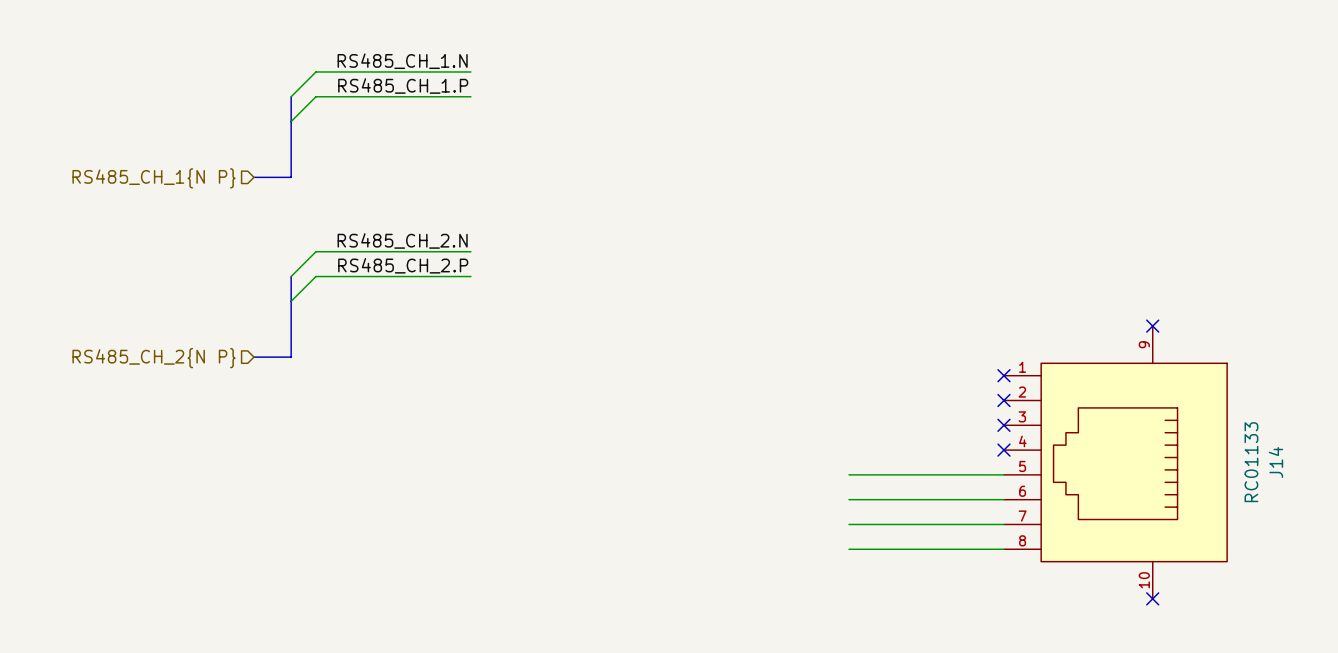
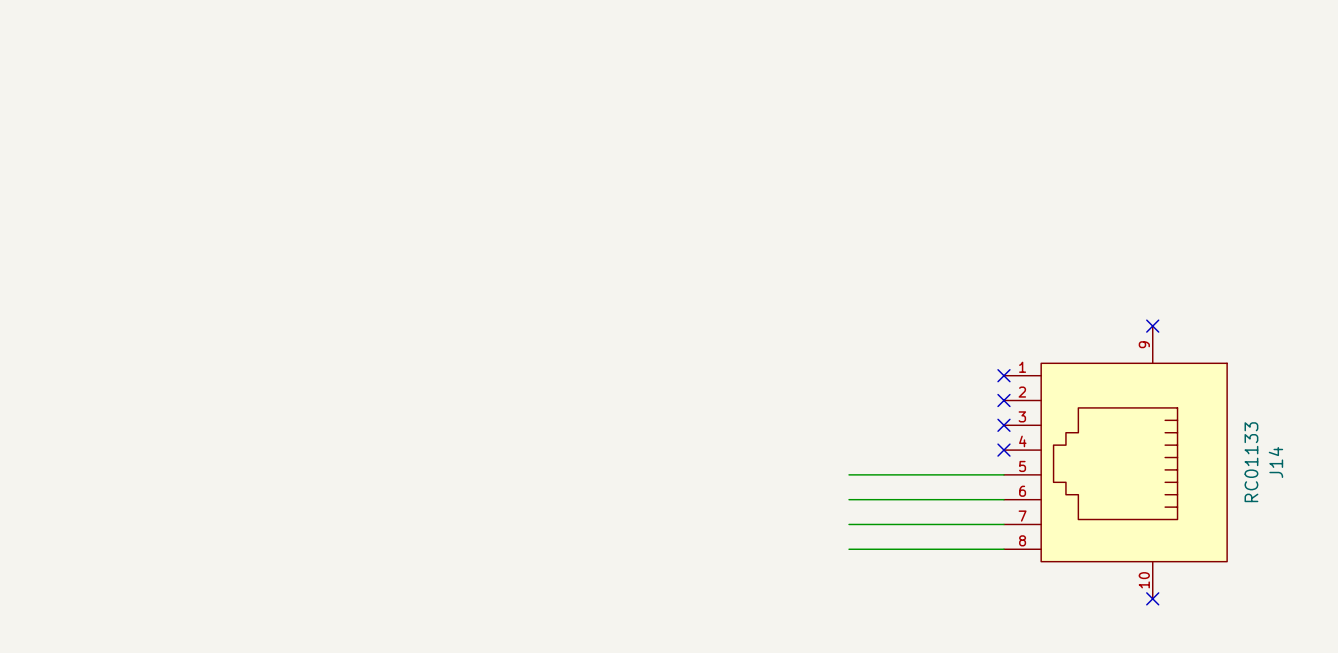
label: RS485_CH_1.N (402, 61) -> none
wire: (470, 71) (315, 71) (291, 96) -> none
label: RS485_CH_1.P (403, 86) -> none
bus: (291, 96) (291, 177) (253, 177) -> none
wire: (470, 96) (315, 96) (291, 121) -> none
hierarchical label: RS485_CH_1{N P} (154, 178) -> none
label: RS485_CH_2.N (402, 240) -> none
wire: (315, 251) (470, 251) -> none
wire: (315, 251) (291, 276) -> none
label: RS485_CH_2.P (403, 265) -> none
bus: (291, 276) (291, 357) (253, 357) -> none
wire: (470, 276) (315, 276) (291, 301) -> none
hierarchical label: RS485_CH_2{N P} (154, 358) -> none

